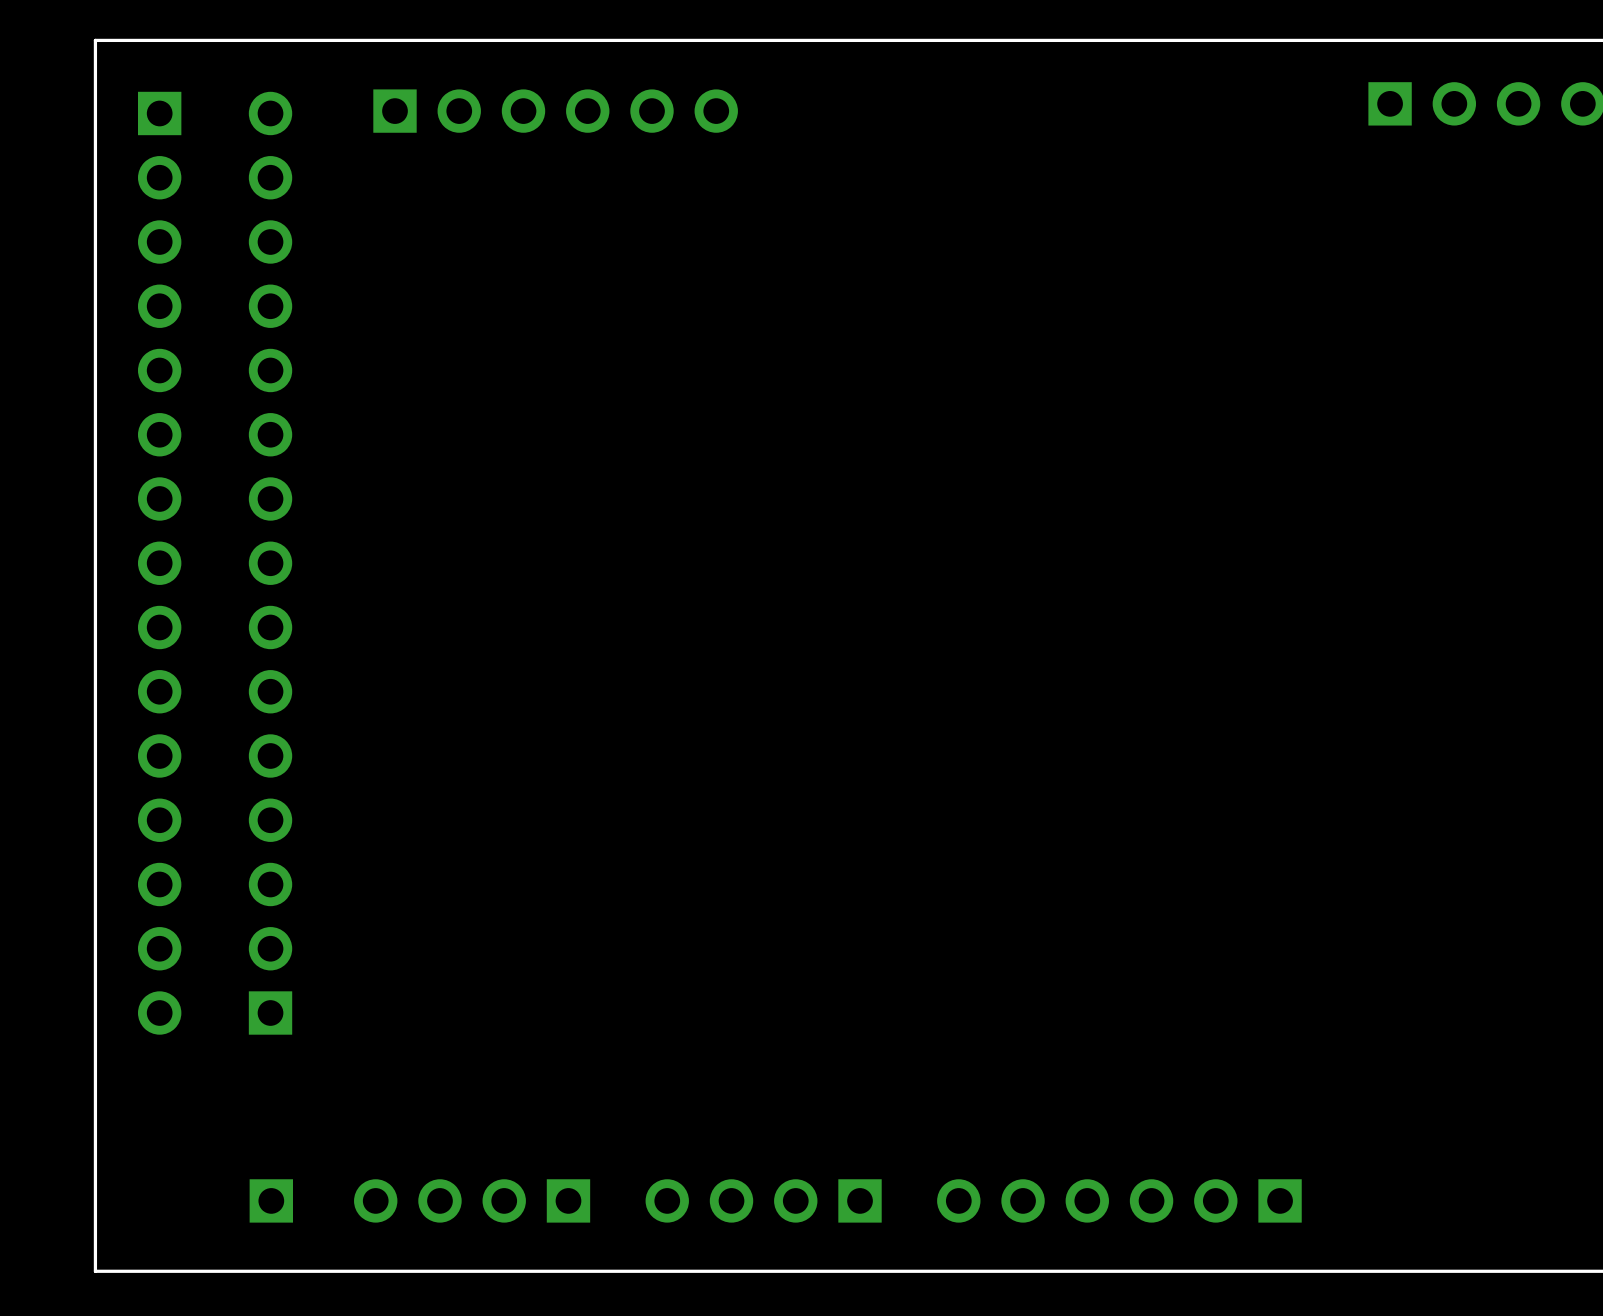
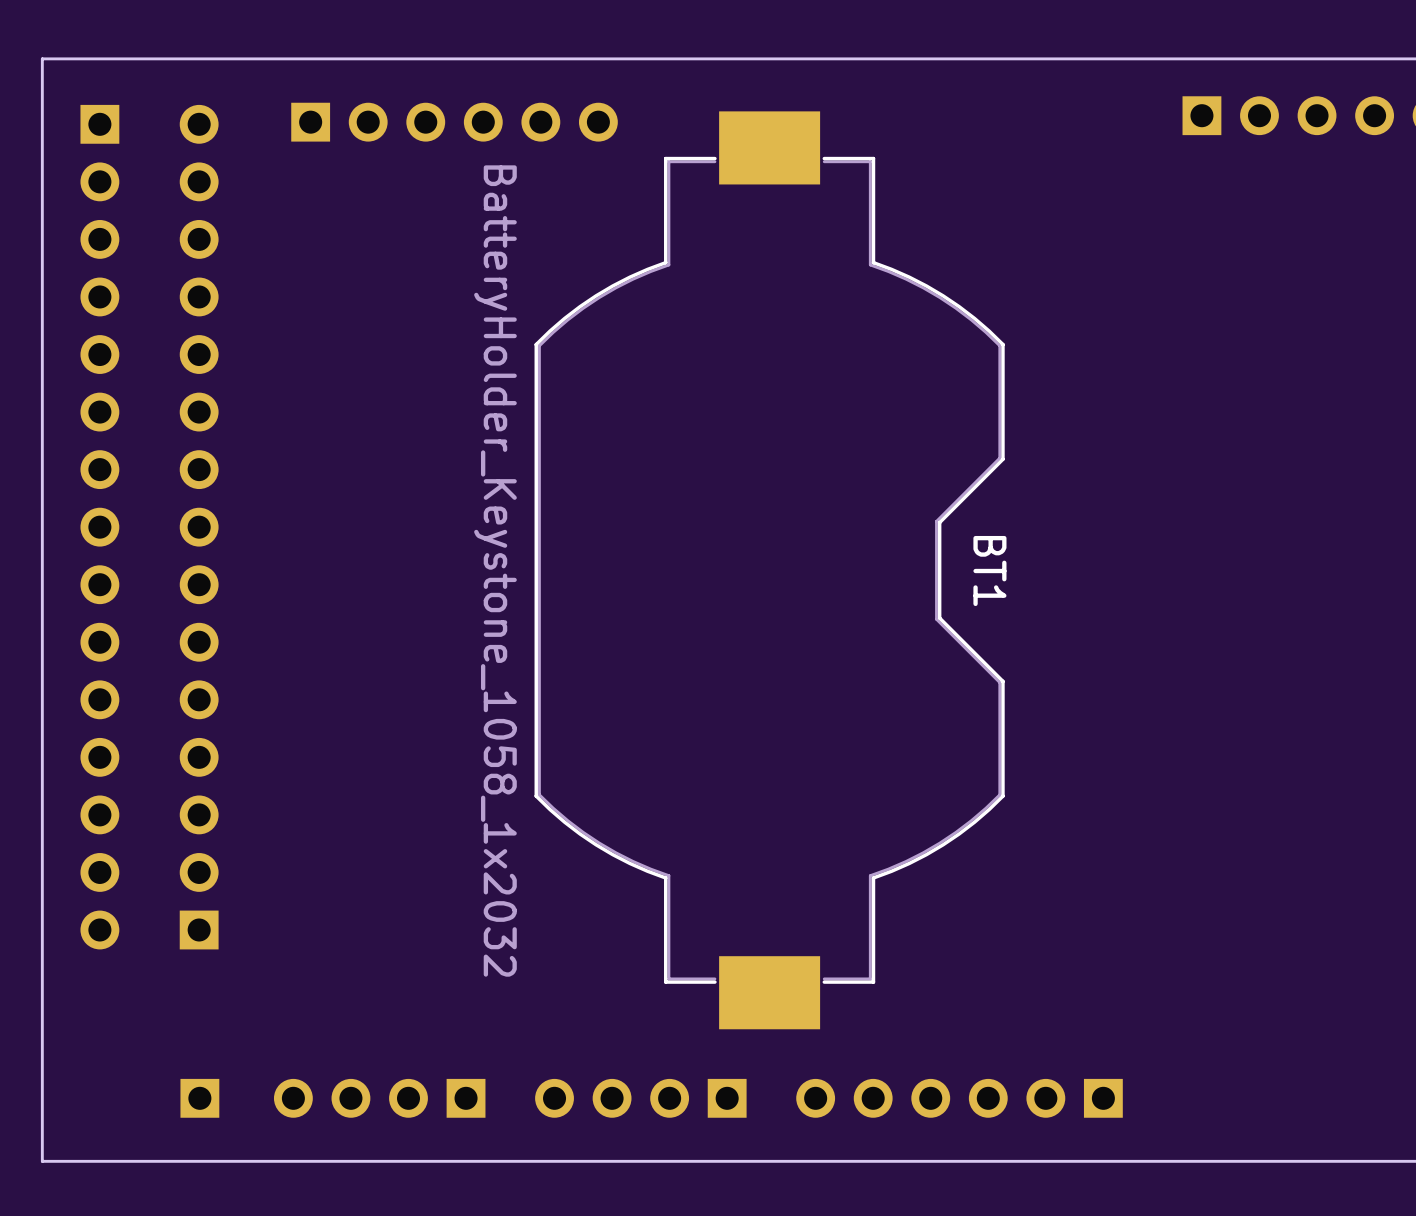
BT1: none -> BatteryHolder_Keystone_1058_1x2032 (769, 570)

